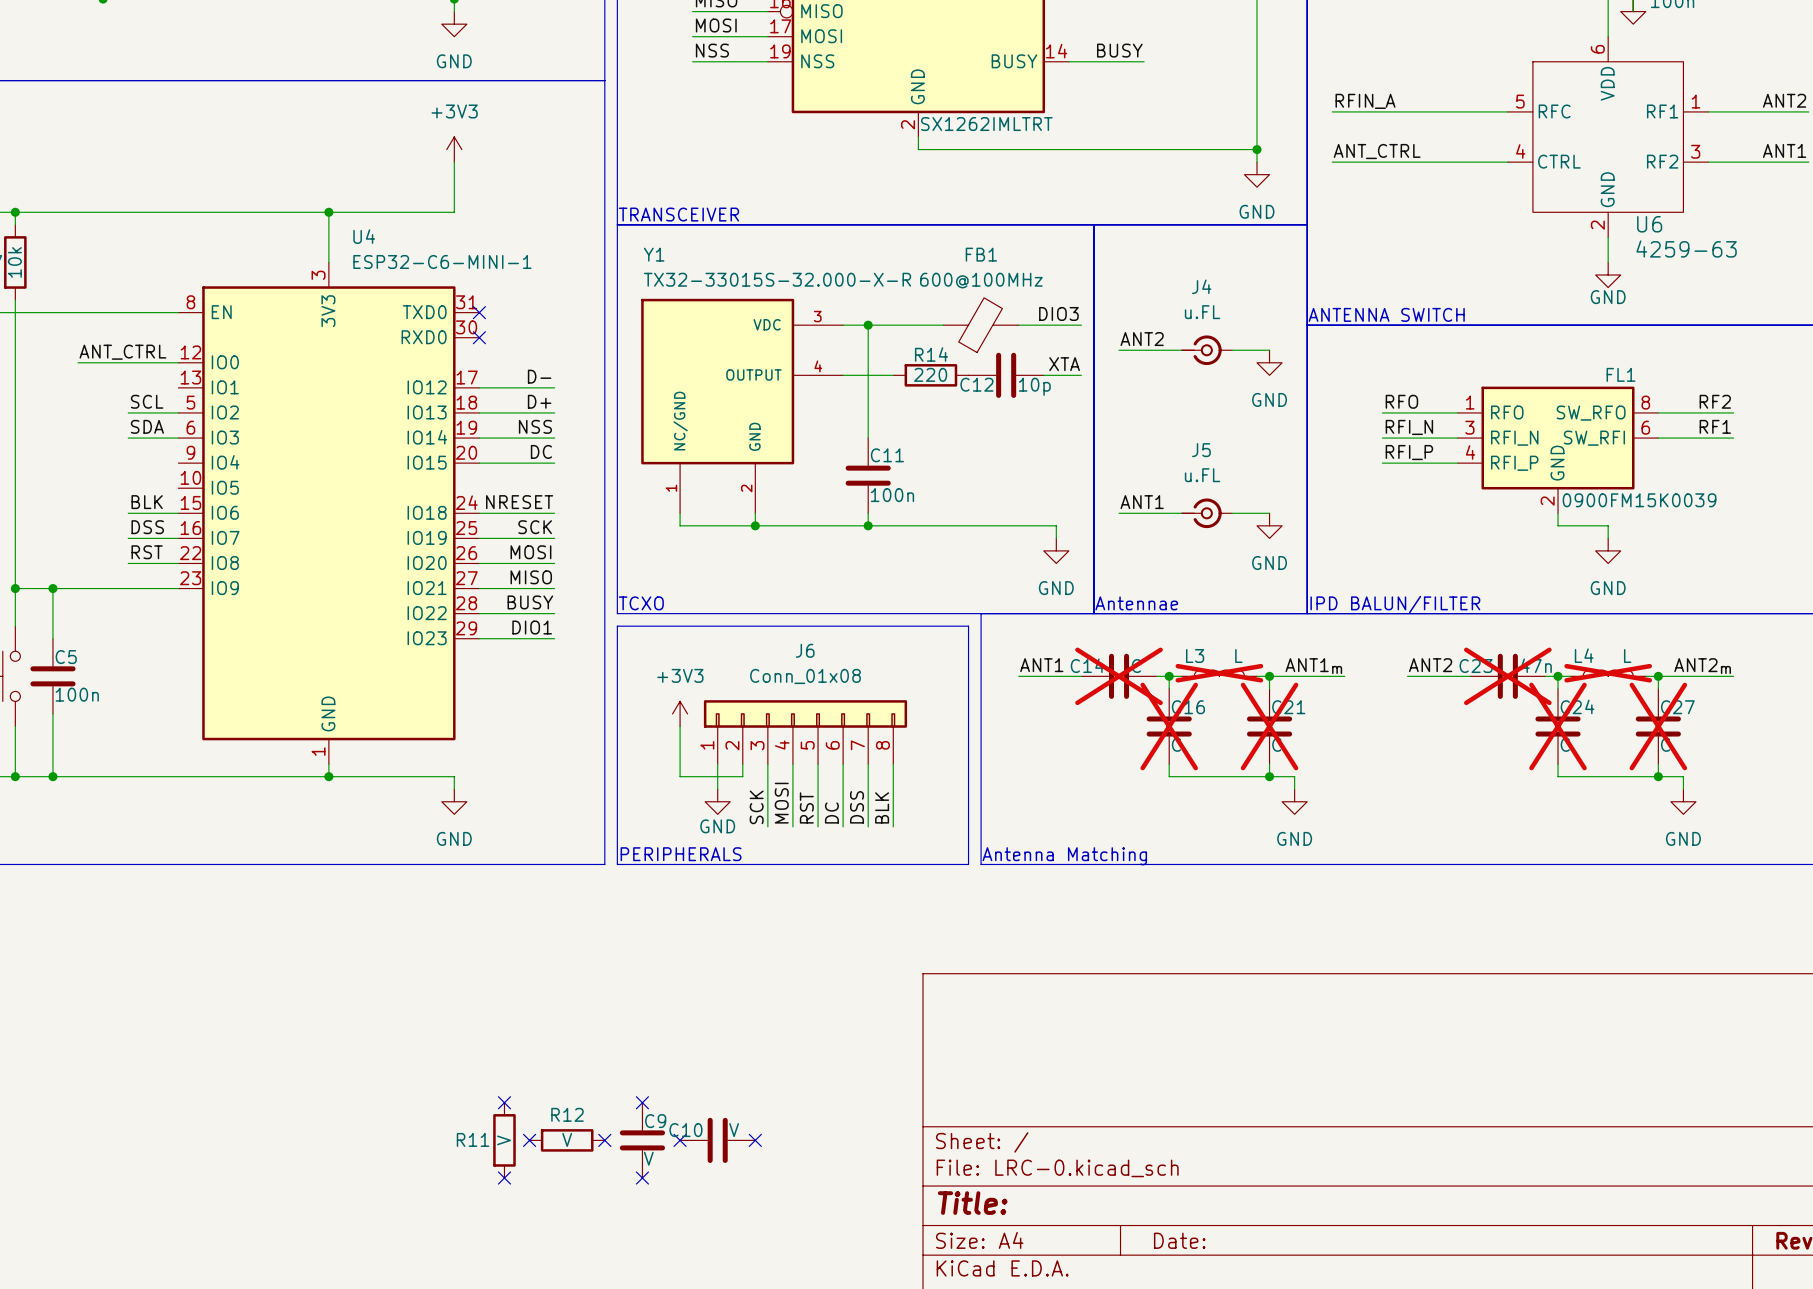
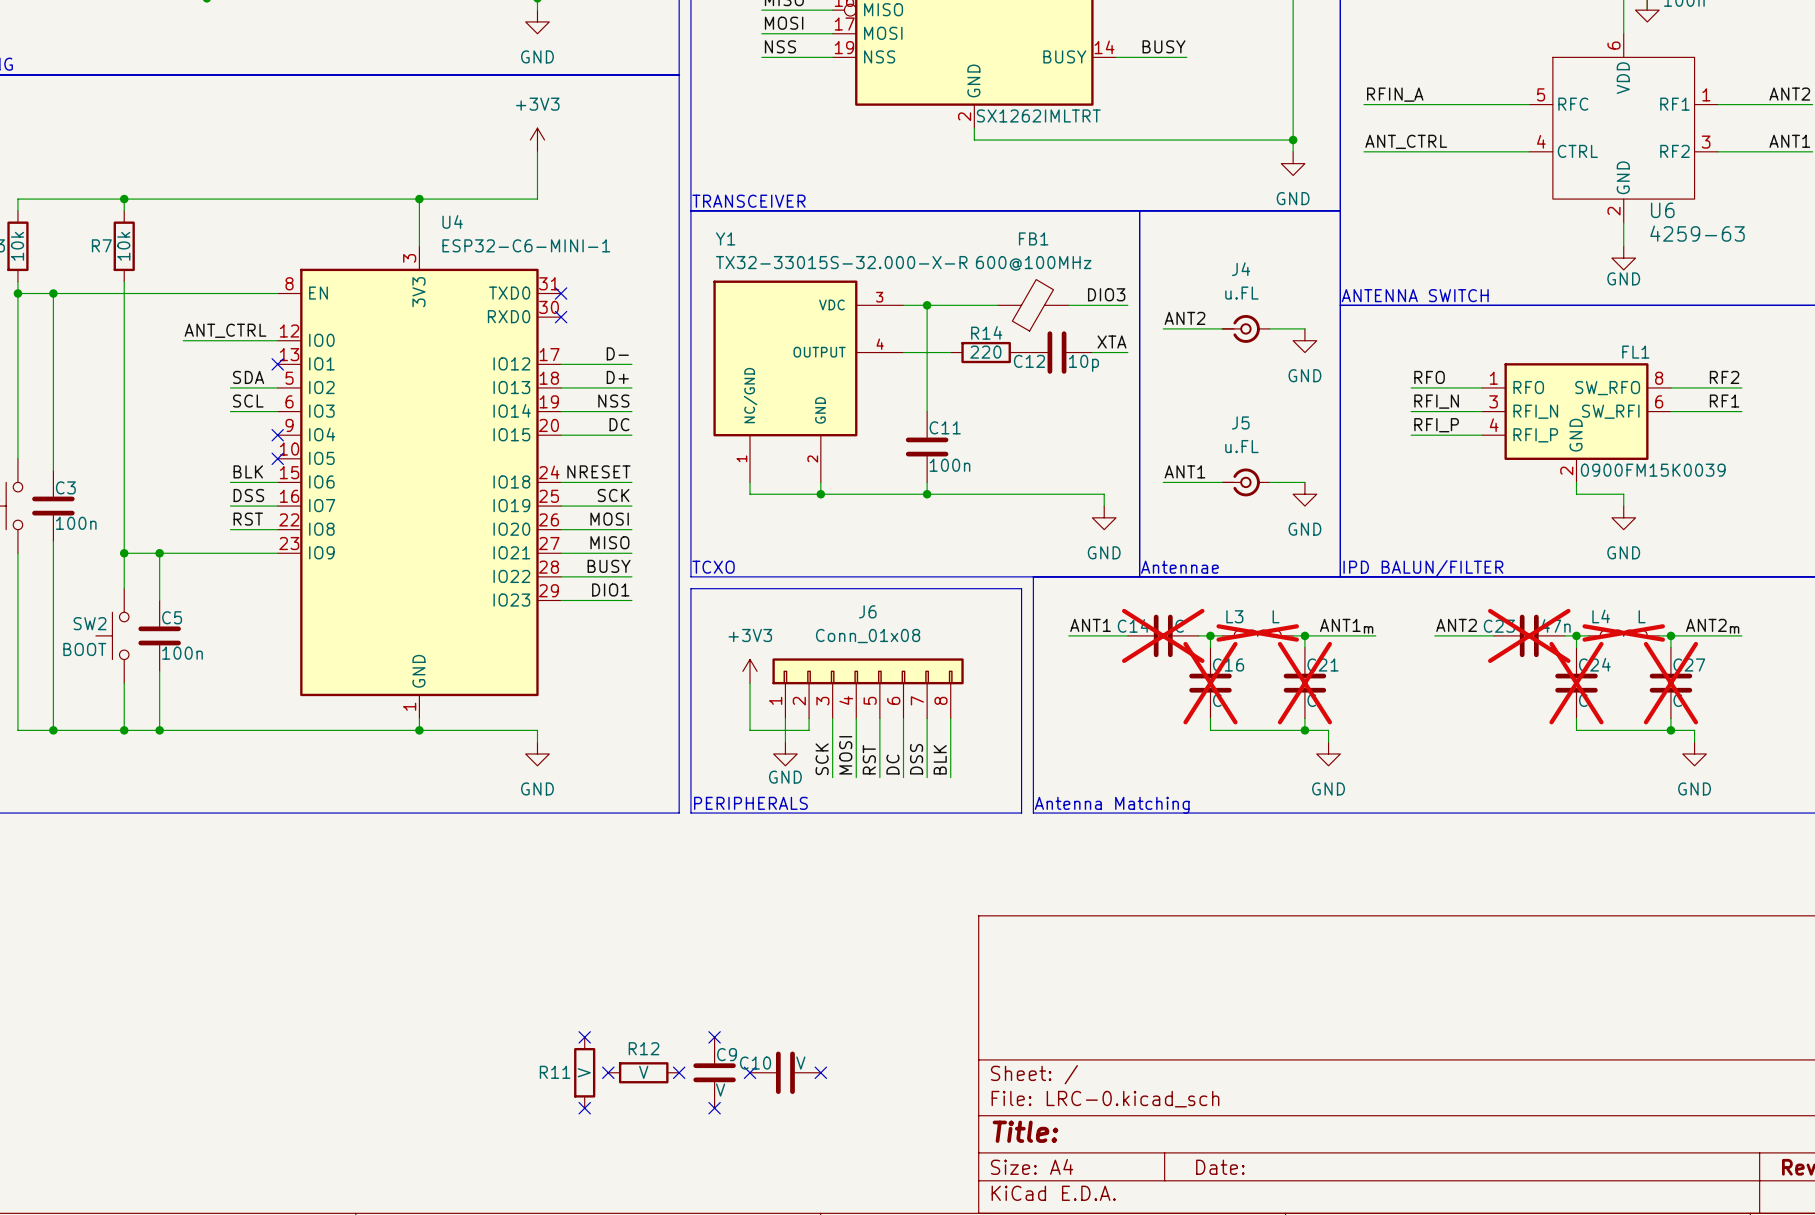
no-connect mark: none -> (277, 364)
label: SCL (147, 401) -> SDA (248, 377)
label: SDA (147, 426) -> SCL (248, 401)
no-connect mark: none -> (277, 435)
no-connect mark: none -> (277, 458)

